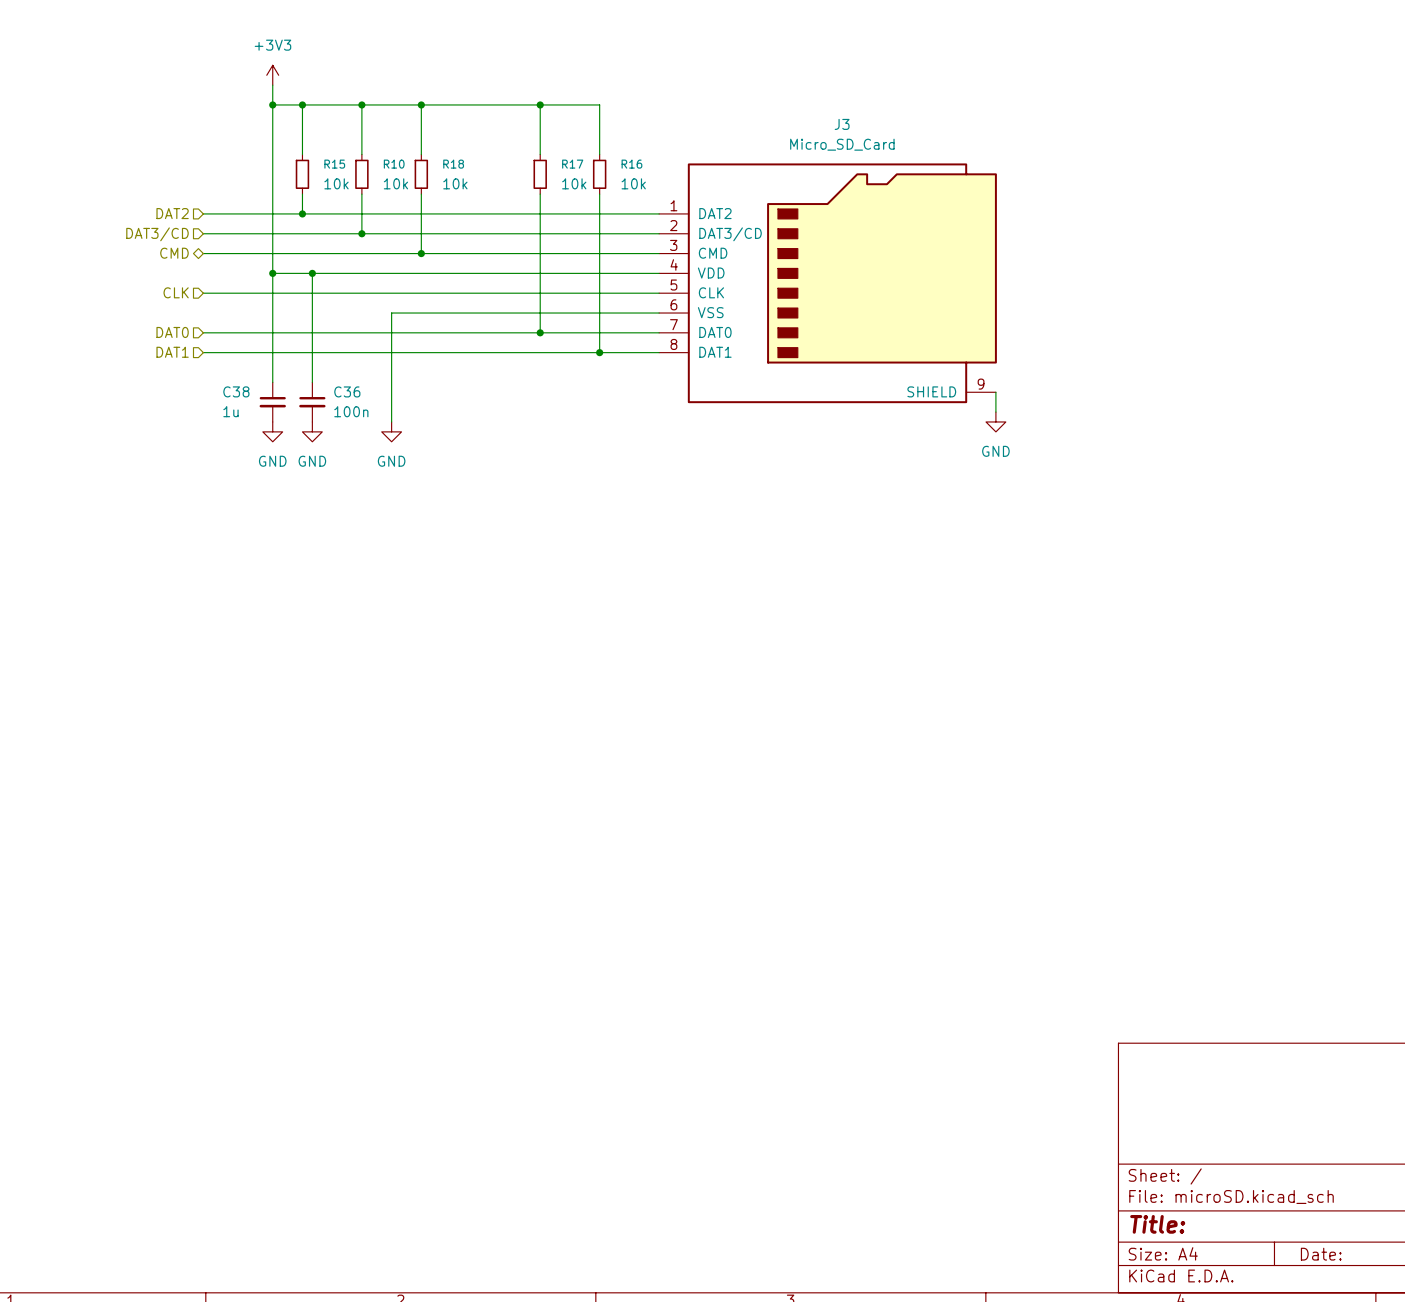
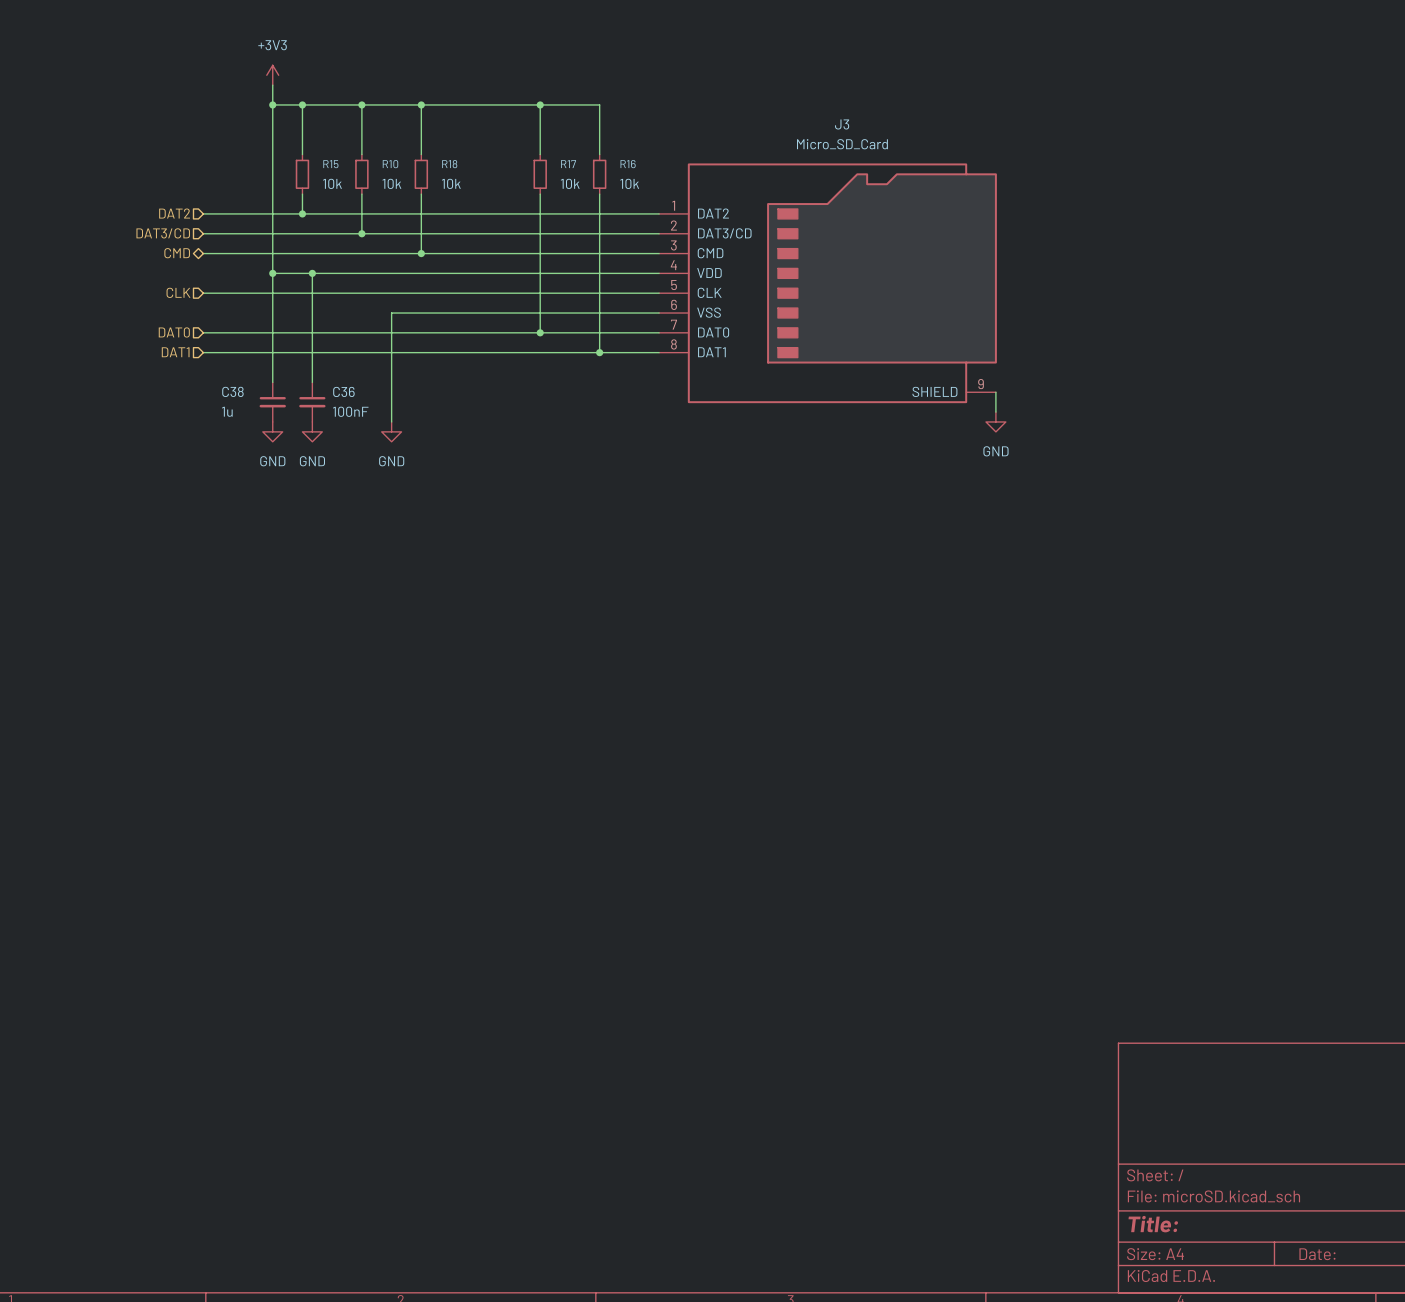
C36 value: 100n (351, 411) -> 100nF (350, 411)

